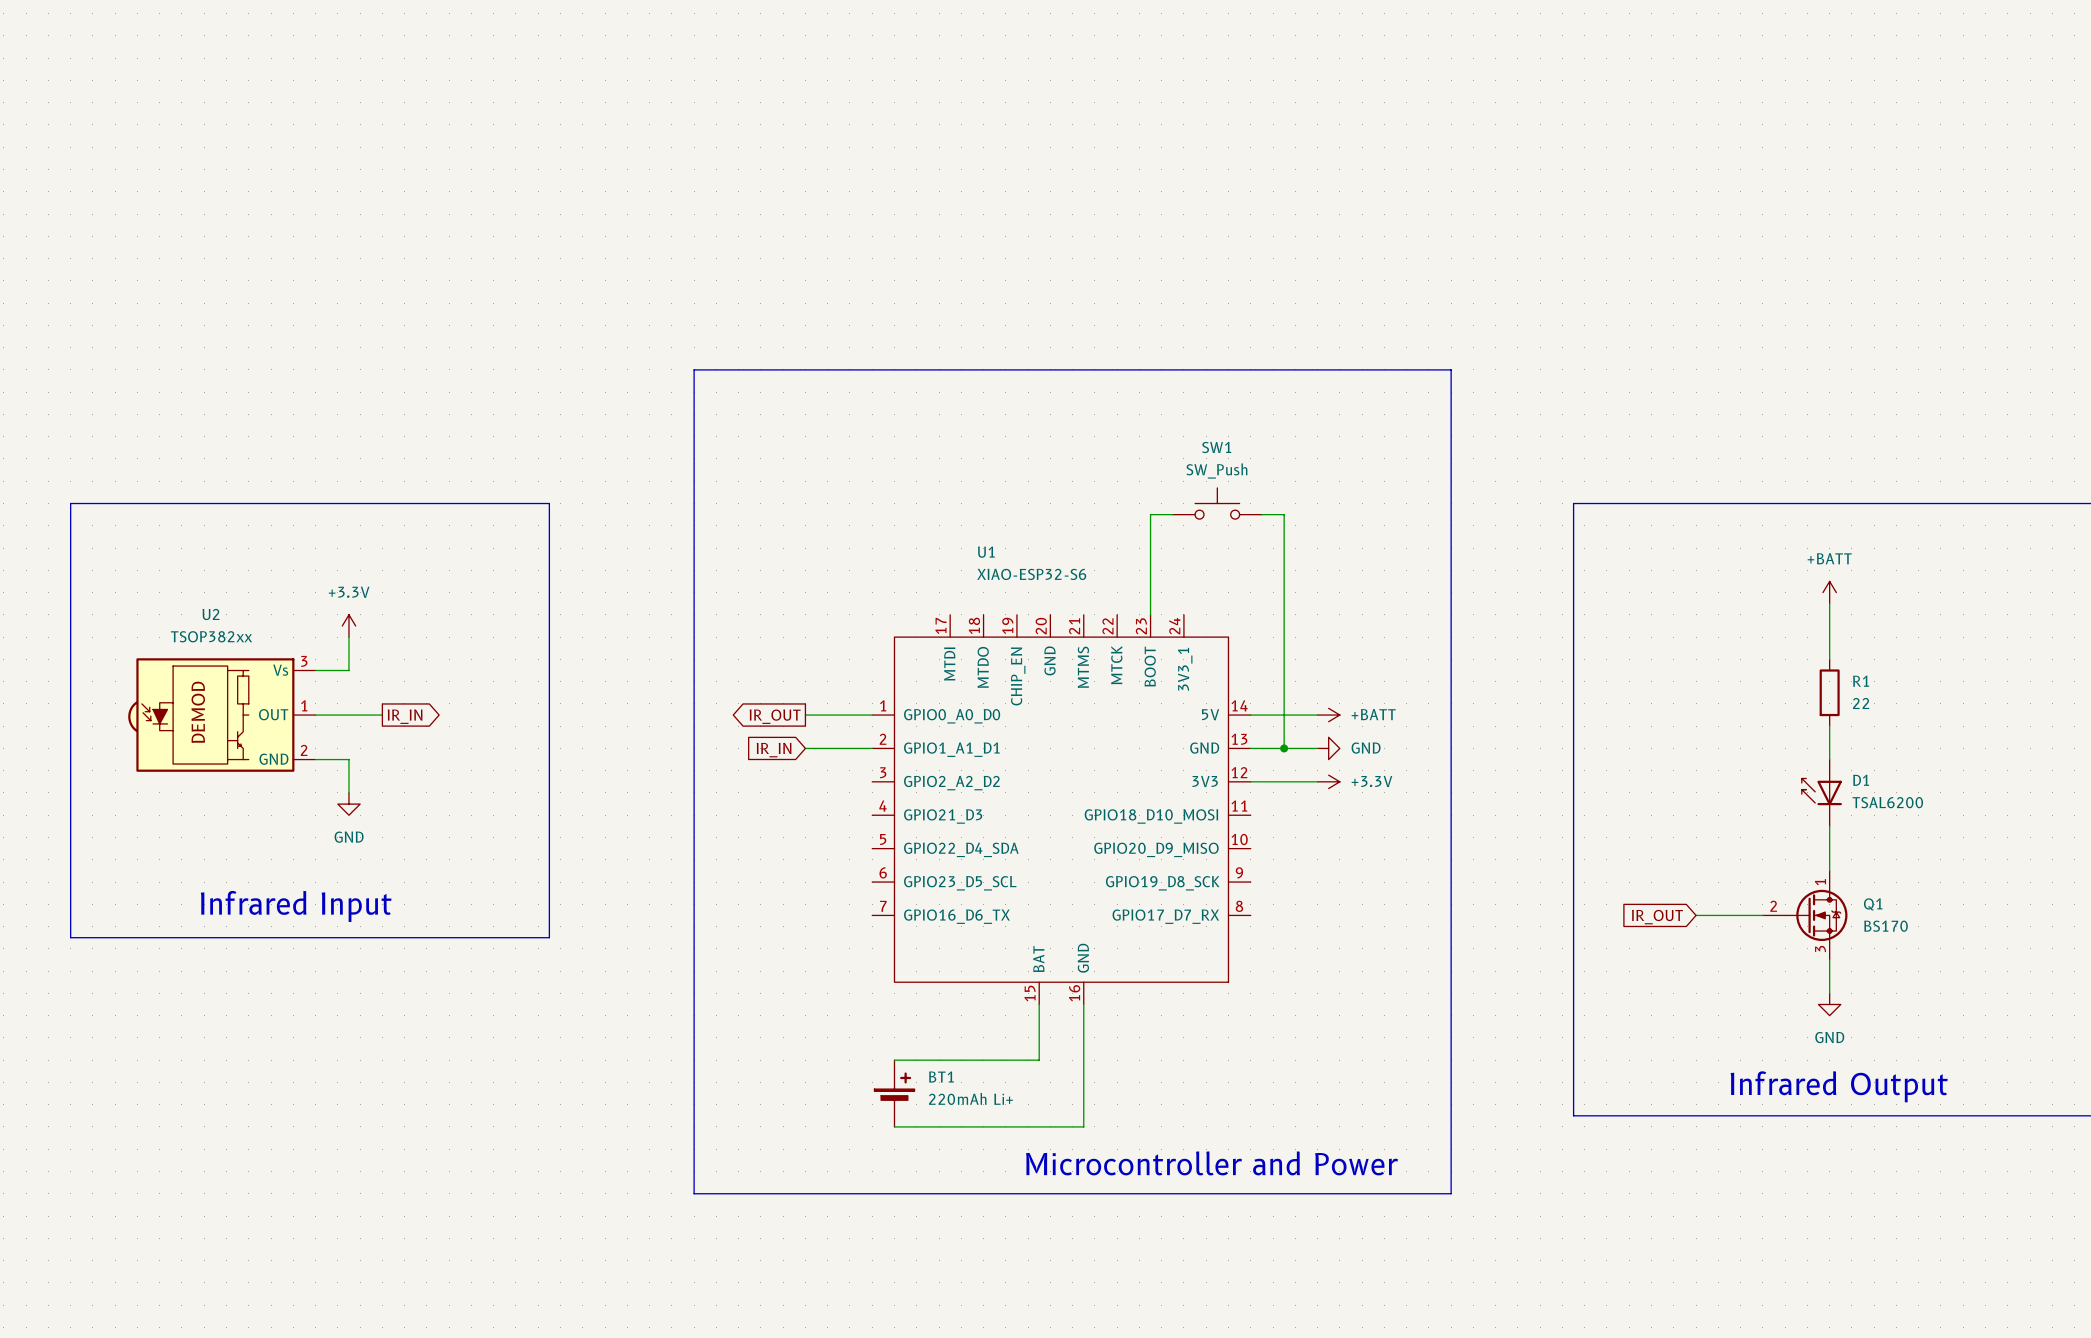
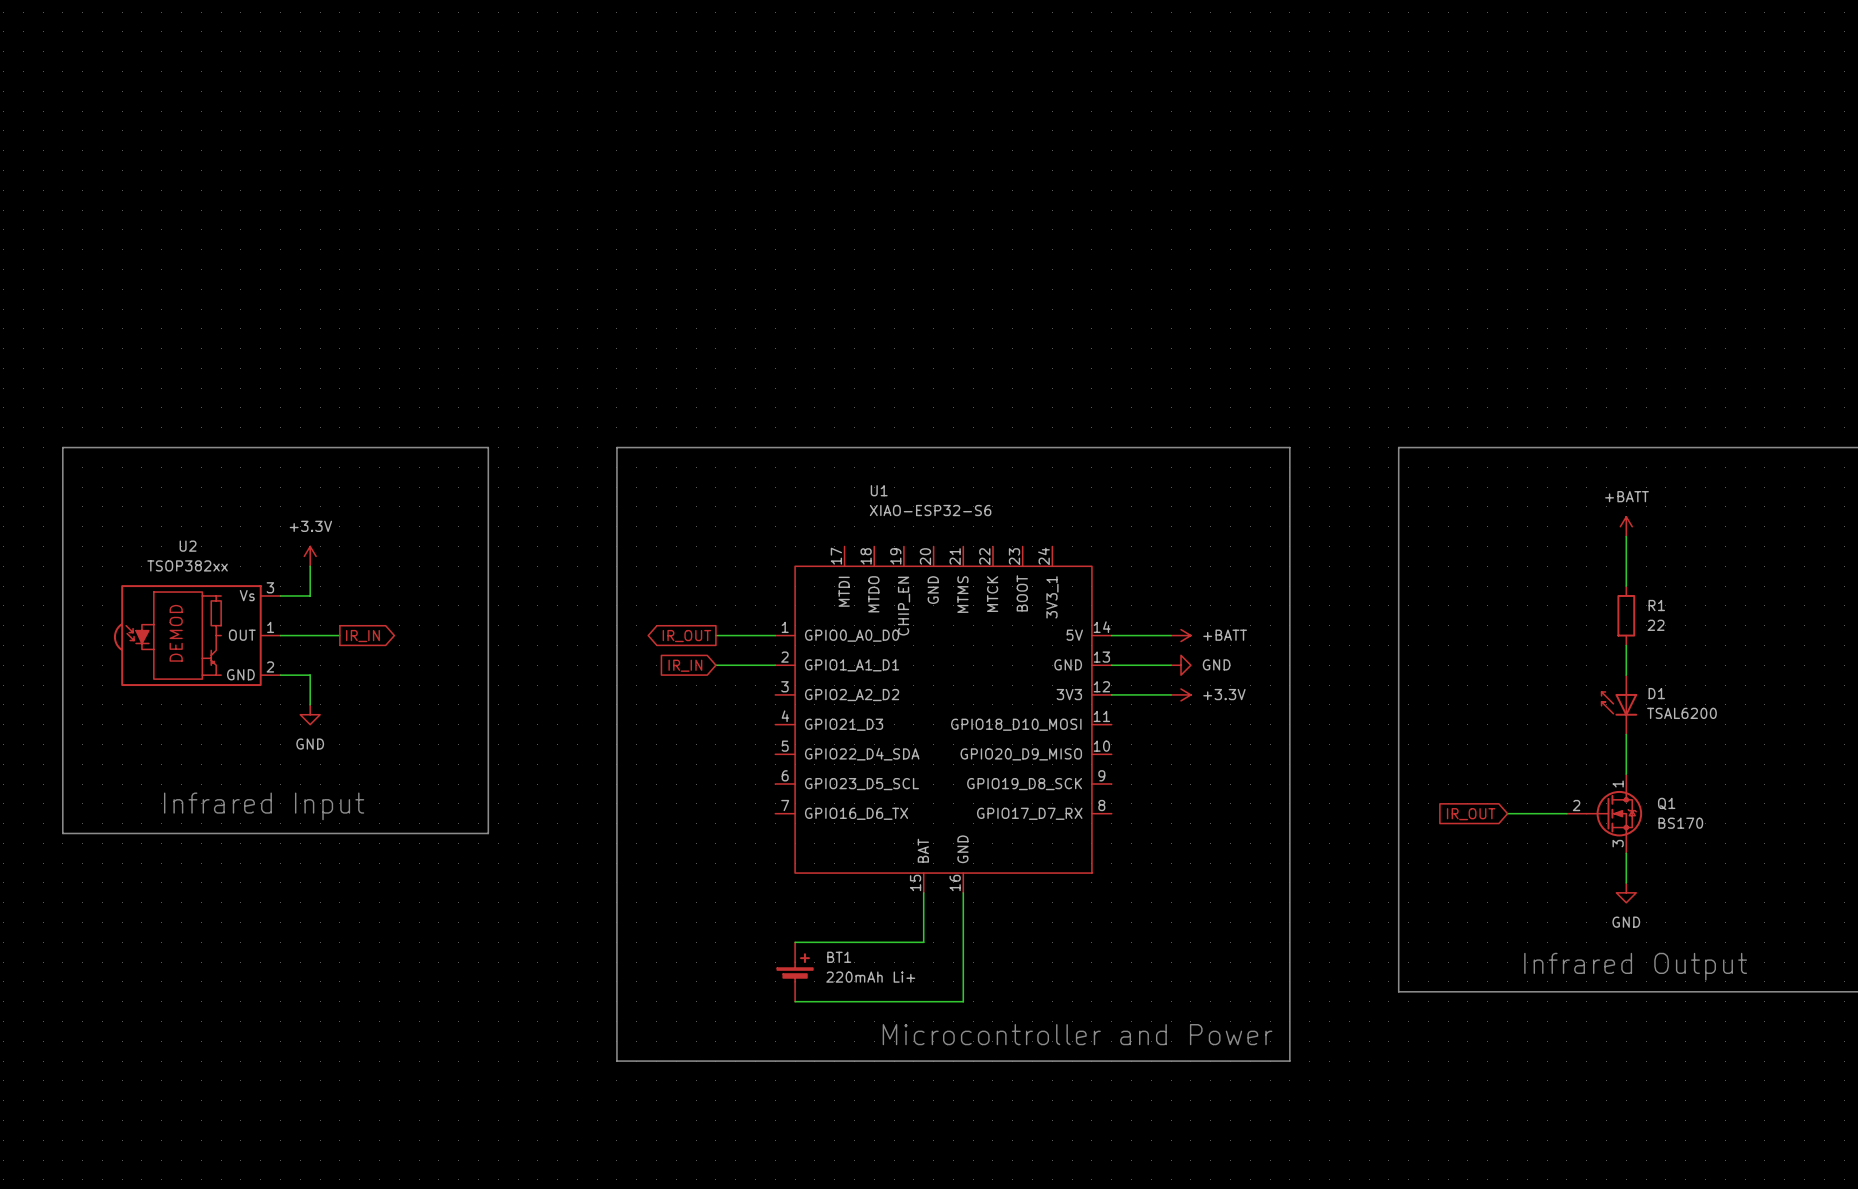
line: (694, 503) (694, 369) (1451, 369) (1451, 503) -> (616, 447) (1289, 447)
SW1: SW_Push (1217, 503) -> none
wire: (1172, 514) (1150, 514) (1150, 614) -> none
wire: (1261, 514) (1284, 514) (1284, 748) -> none
junction: (1284, 748) -> none

